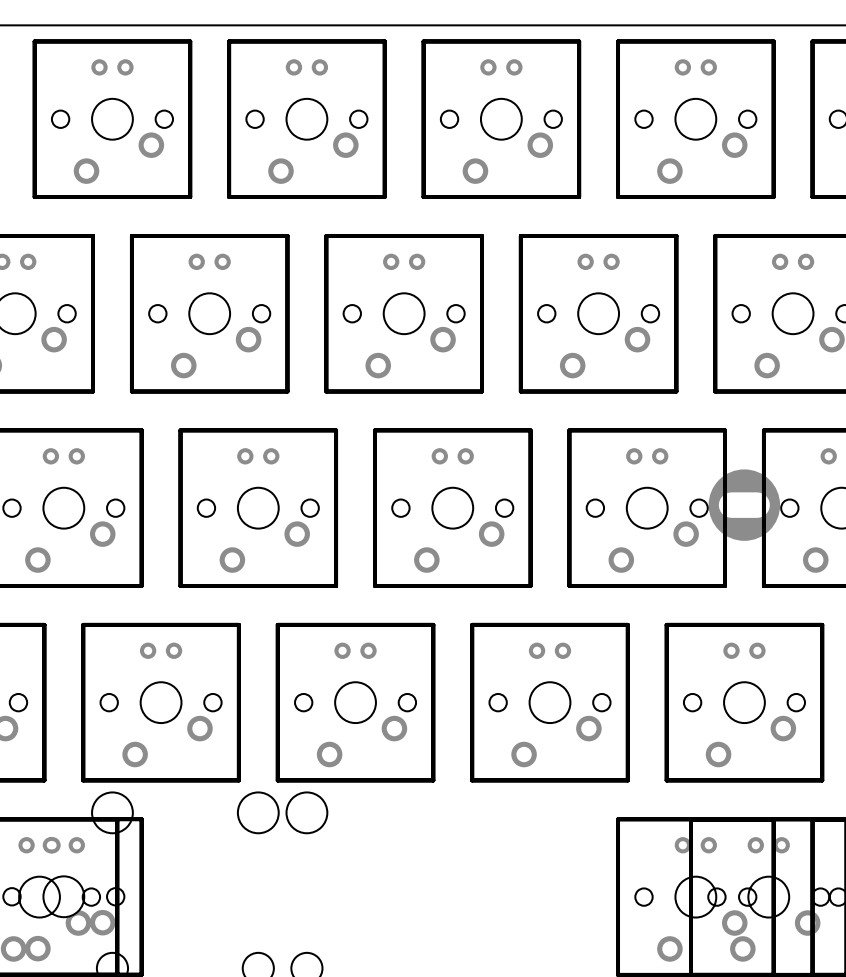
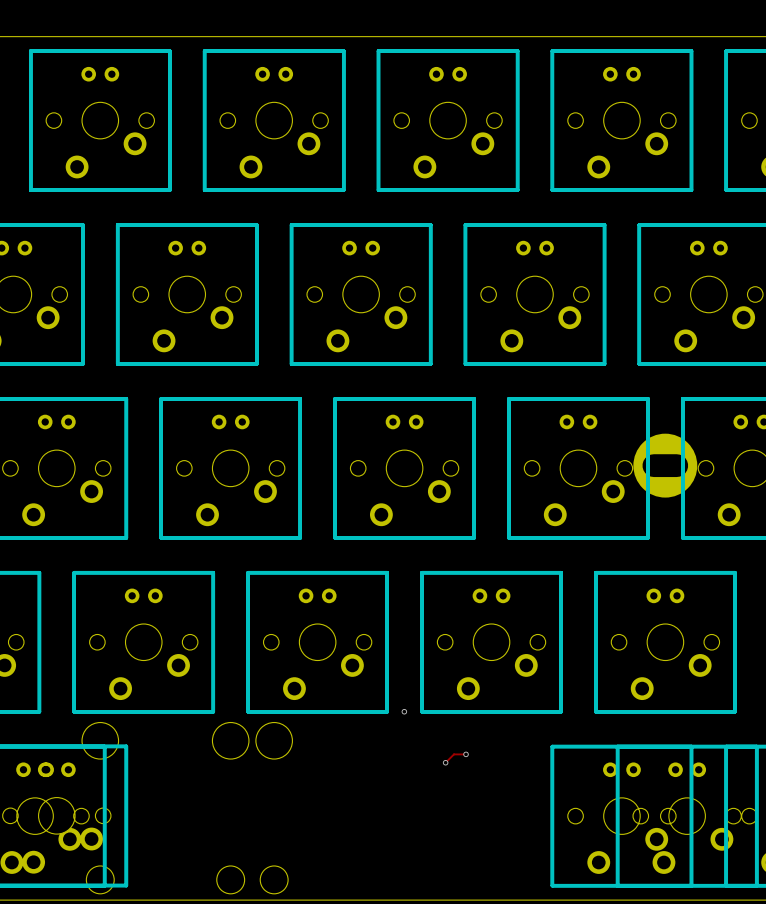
via: none -> (404, 711)
track: none -> (466, 754) (453, 754) (445, 762)
via: none -> (466, 754)
via: none -> (445, 762)

